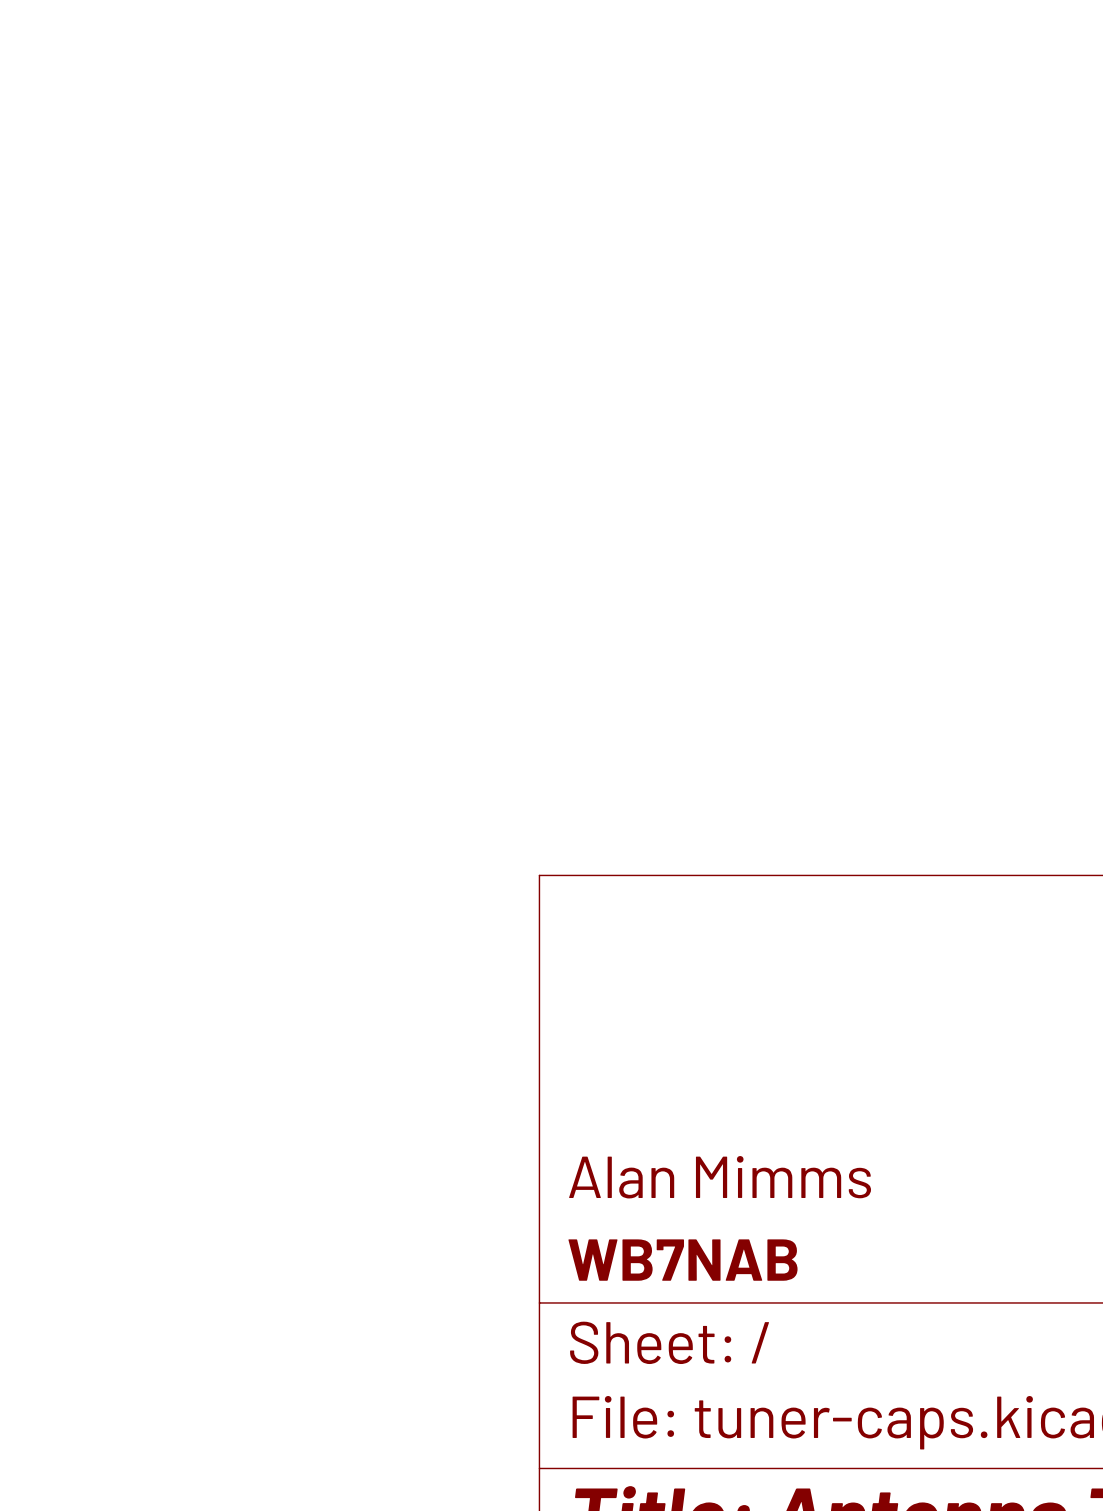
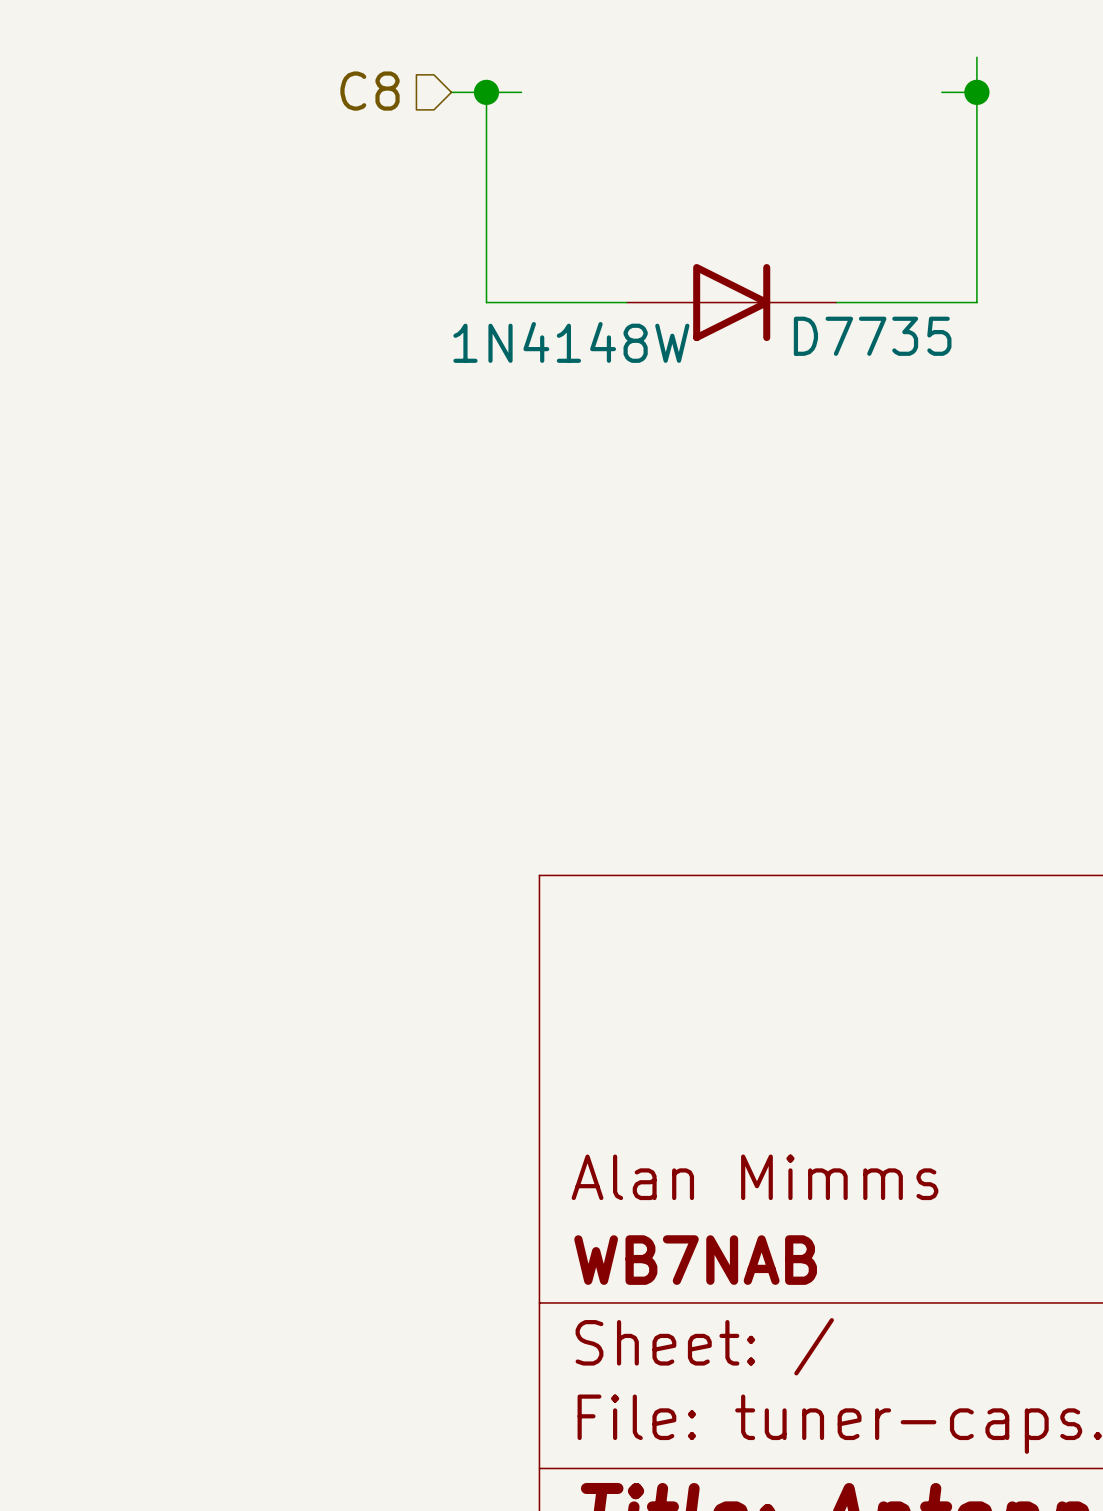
wire: none -> (976, 57) (976, 302) (836, 302)
hierarchical label: none -> C8 (370, 91)
wire: none -> (451, 92) (521, 92)
wire: none -> (486, 92) (486, 302) (626, 302)
junction: none -> (486, 92)
wire: none -> (941, 92) (976, 92)
junction: none -> (976, 92)
D7735: none -> 1N4148W (731, 302)

